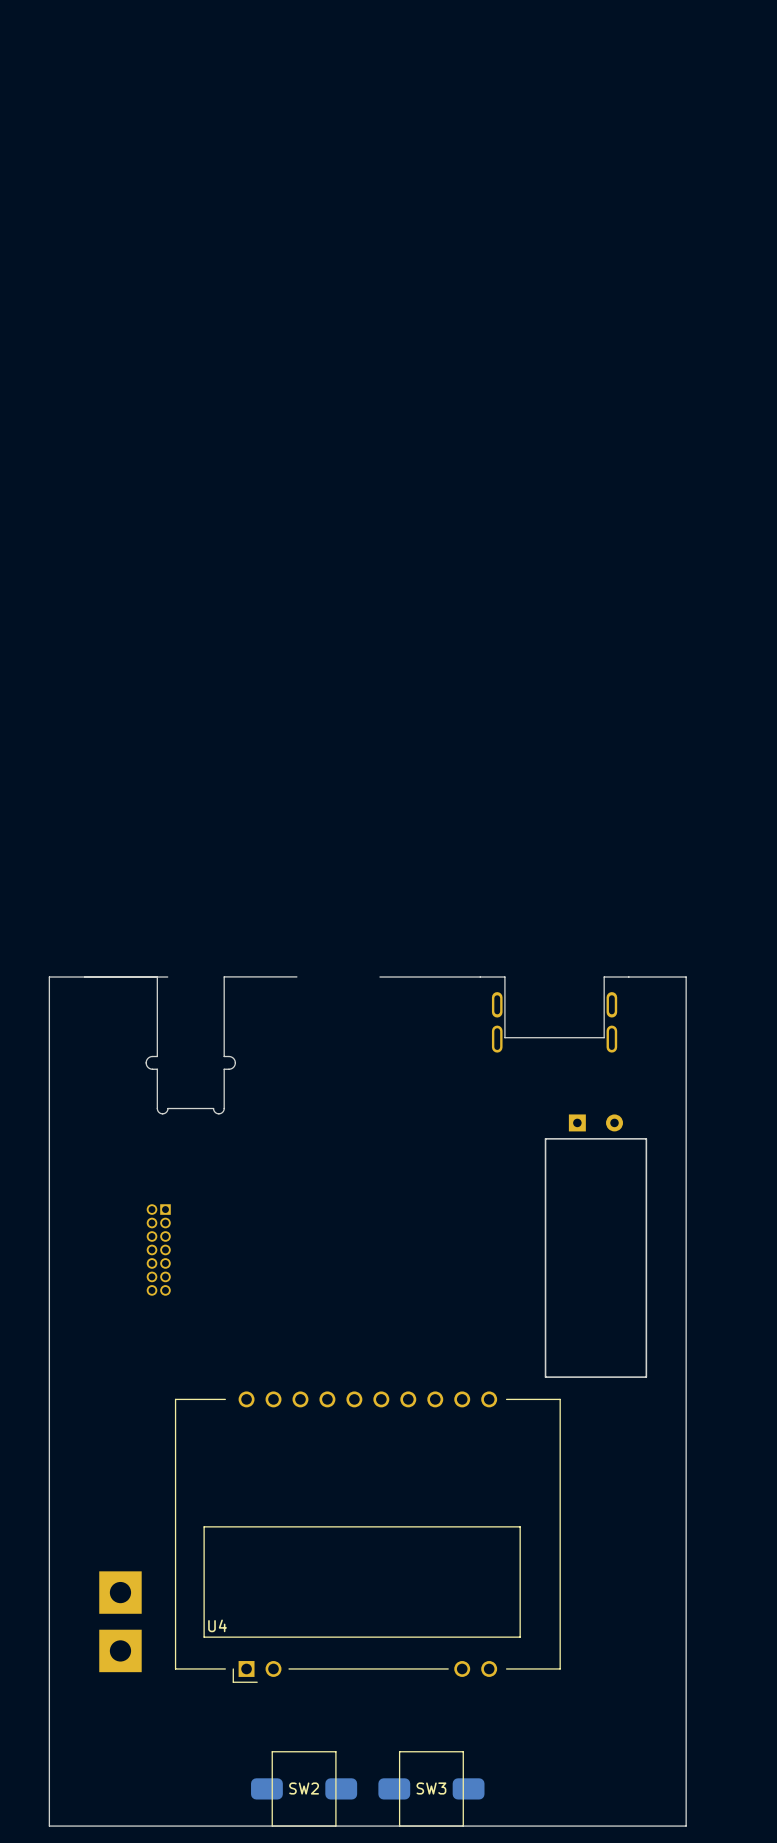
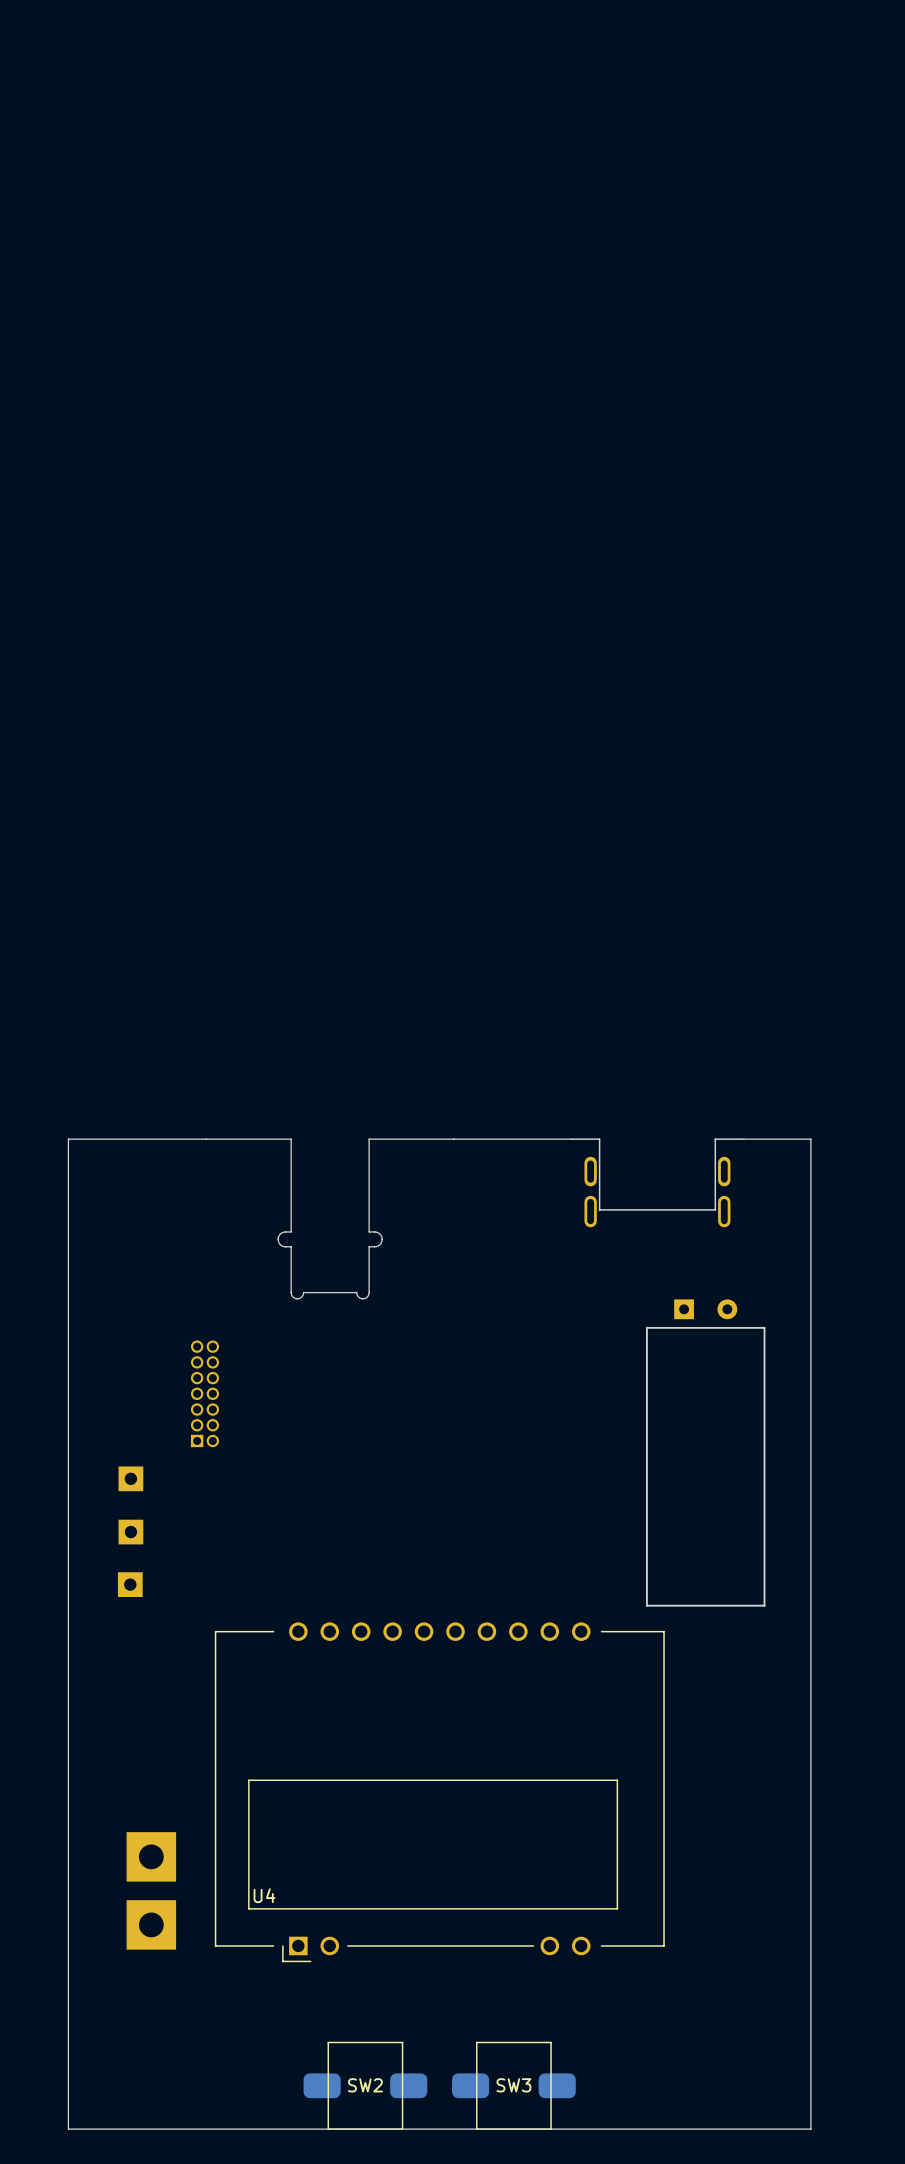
part position: (190, 1045) -> (330, 1218)
part rotation: 0° (158, 1249) -> 180° (204, 1393)
part position: (158, 1249) -> (204, 1393)
part: none -> (130, 1478)
part: none -> (130, 1532)
part: none -> (130, 1584)

